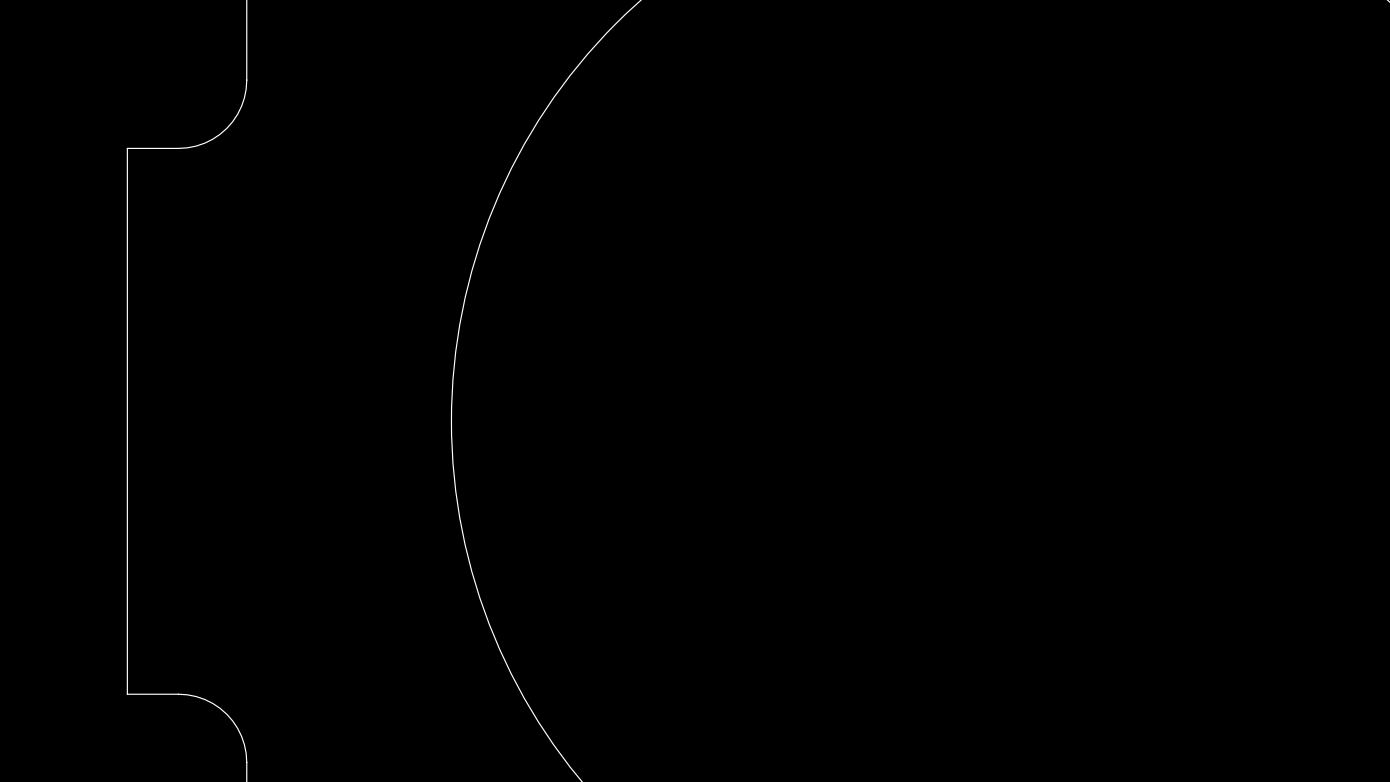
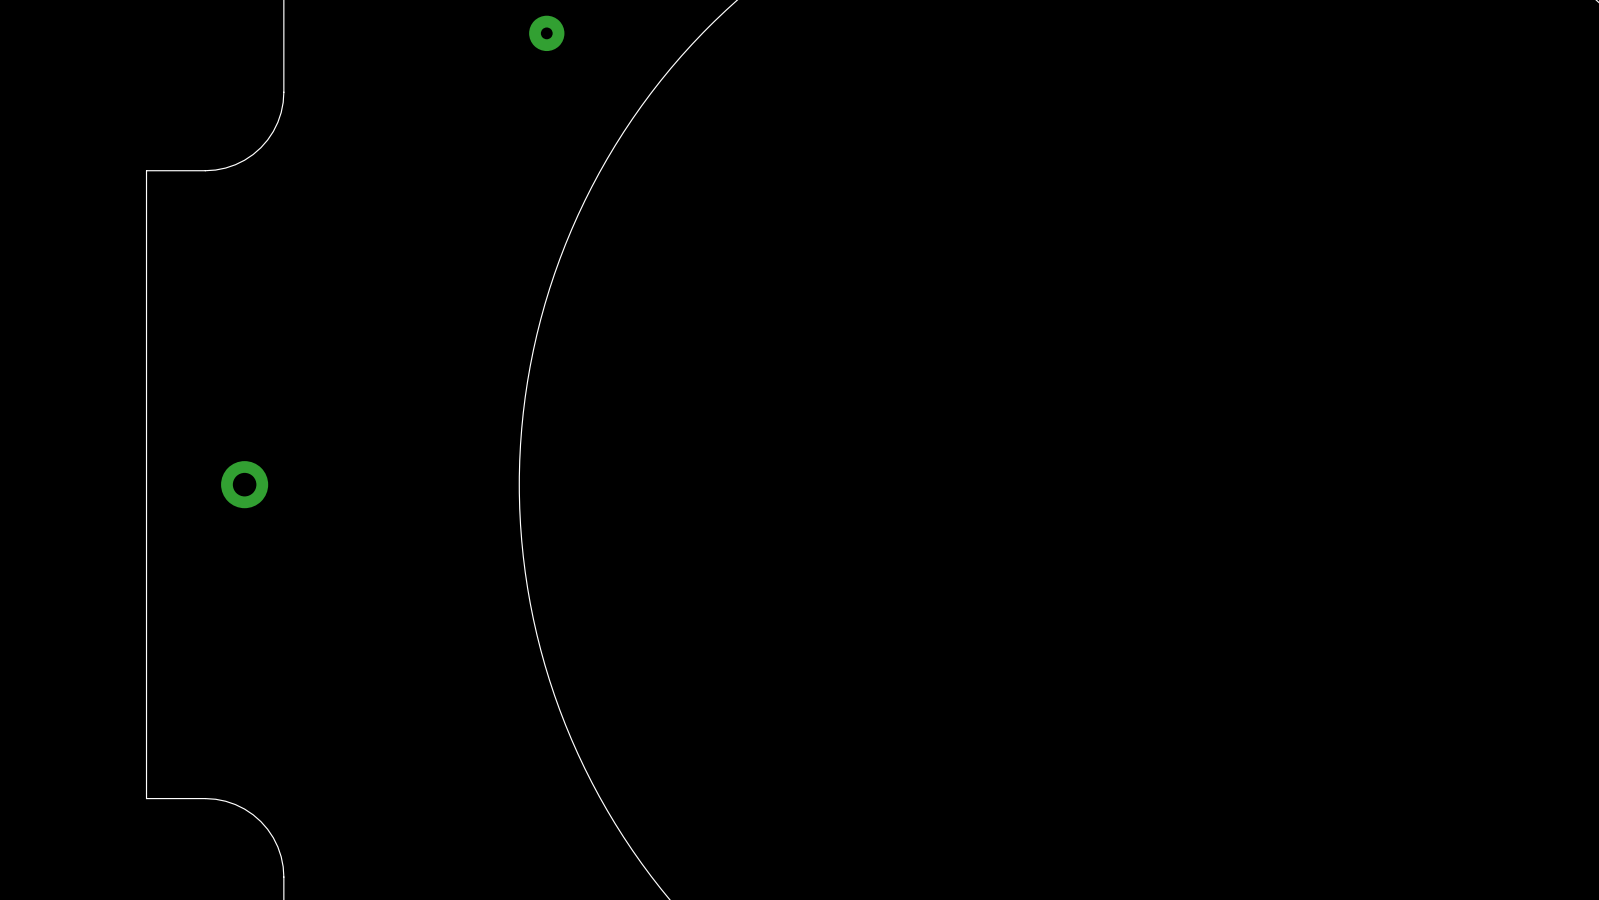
via: none -> (546, 33)
via: none -> (244, 484)

